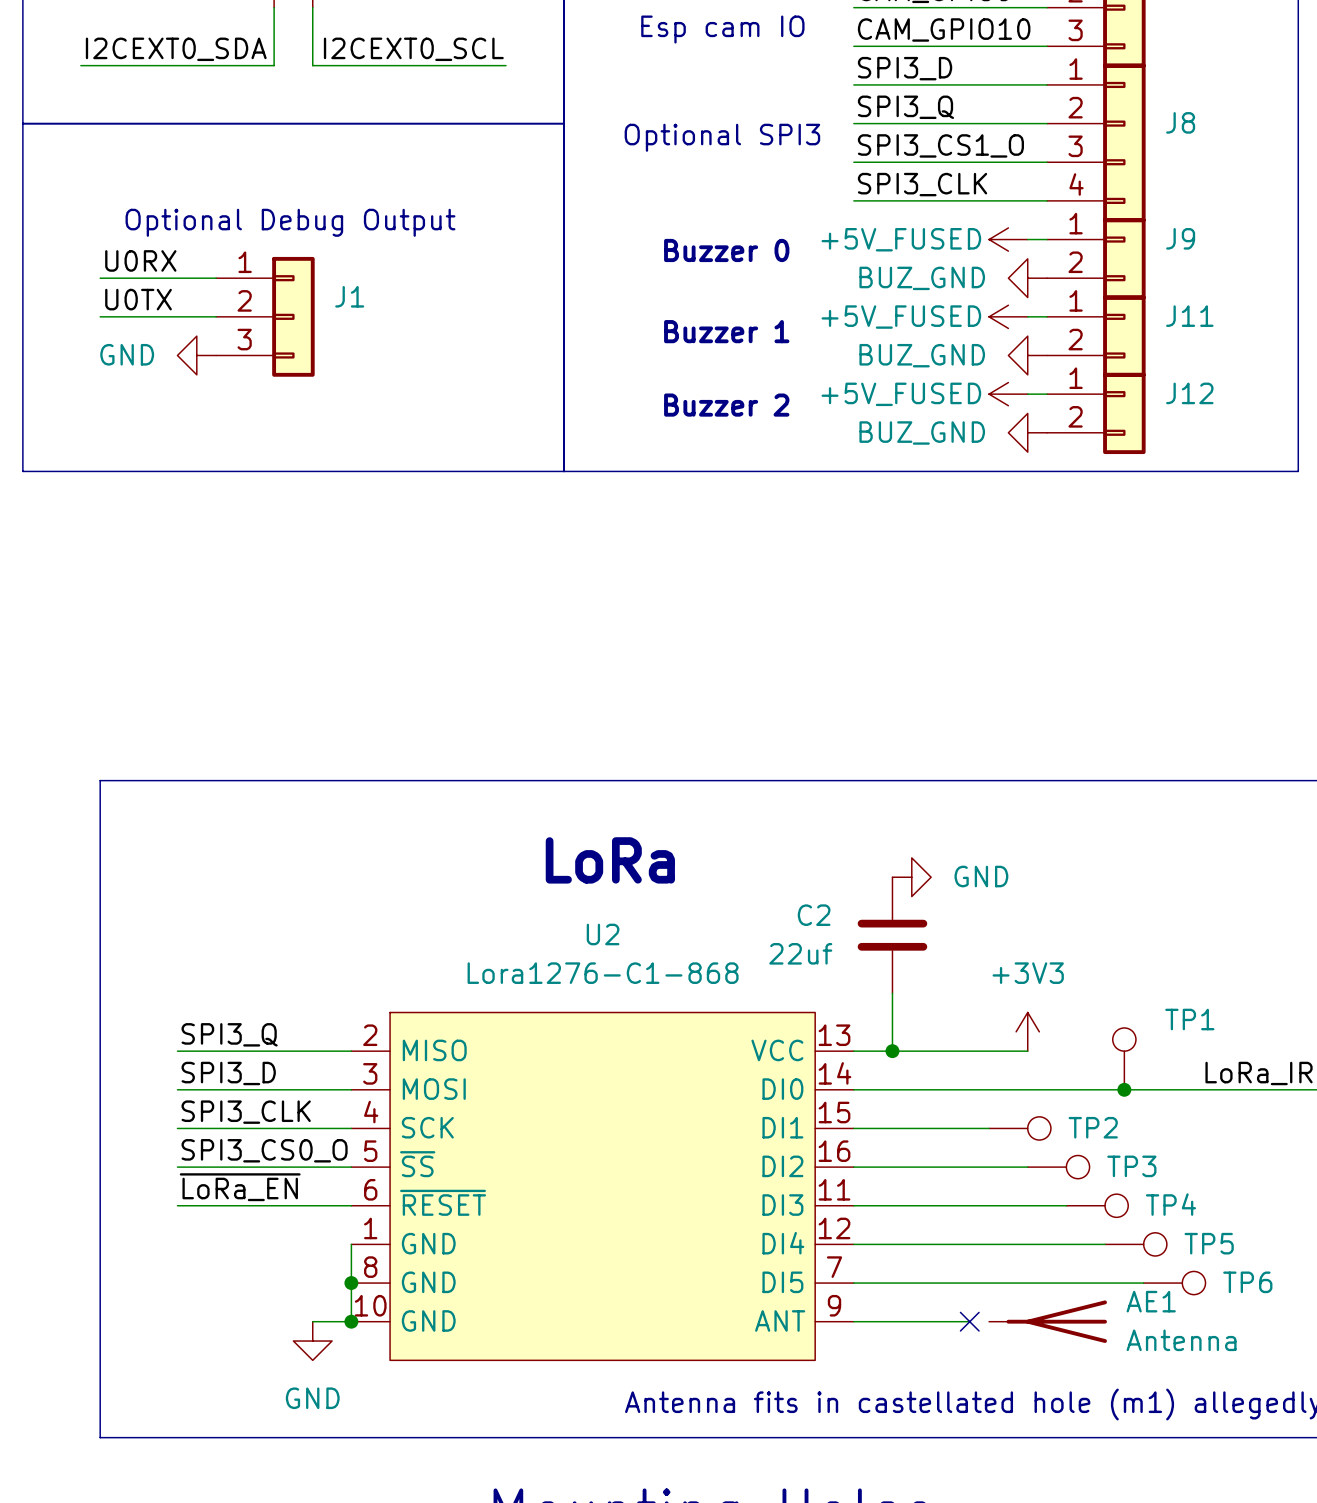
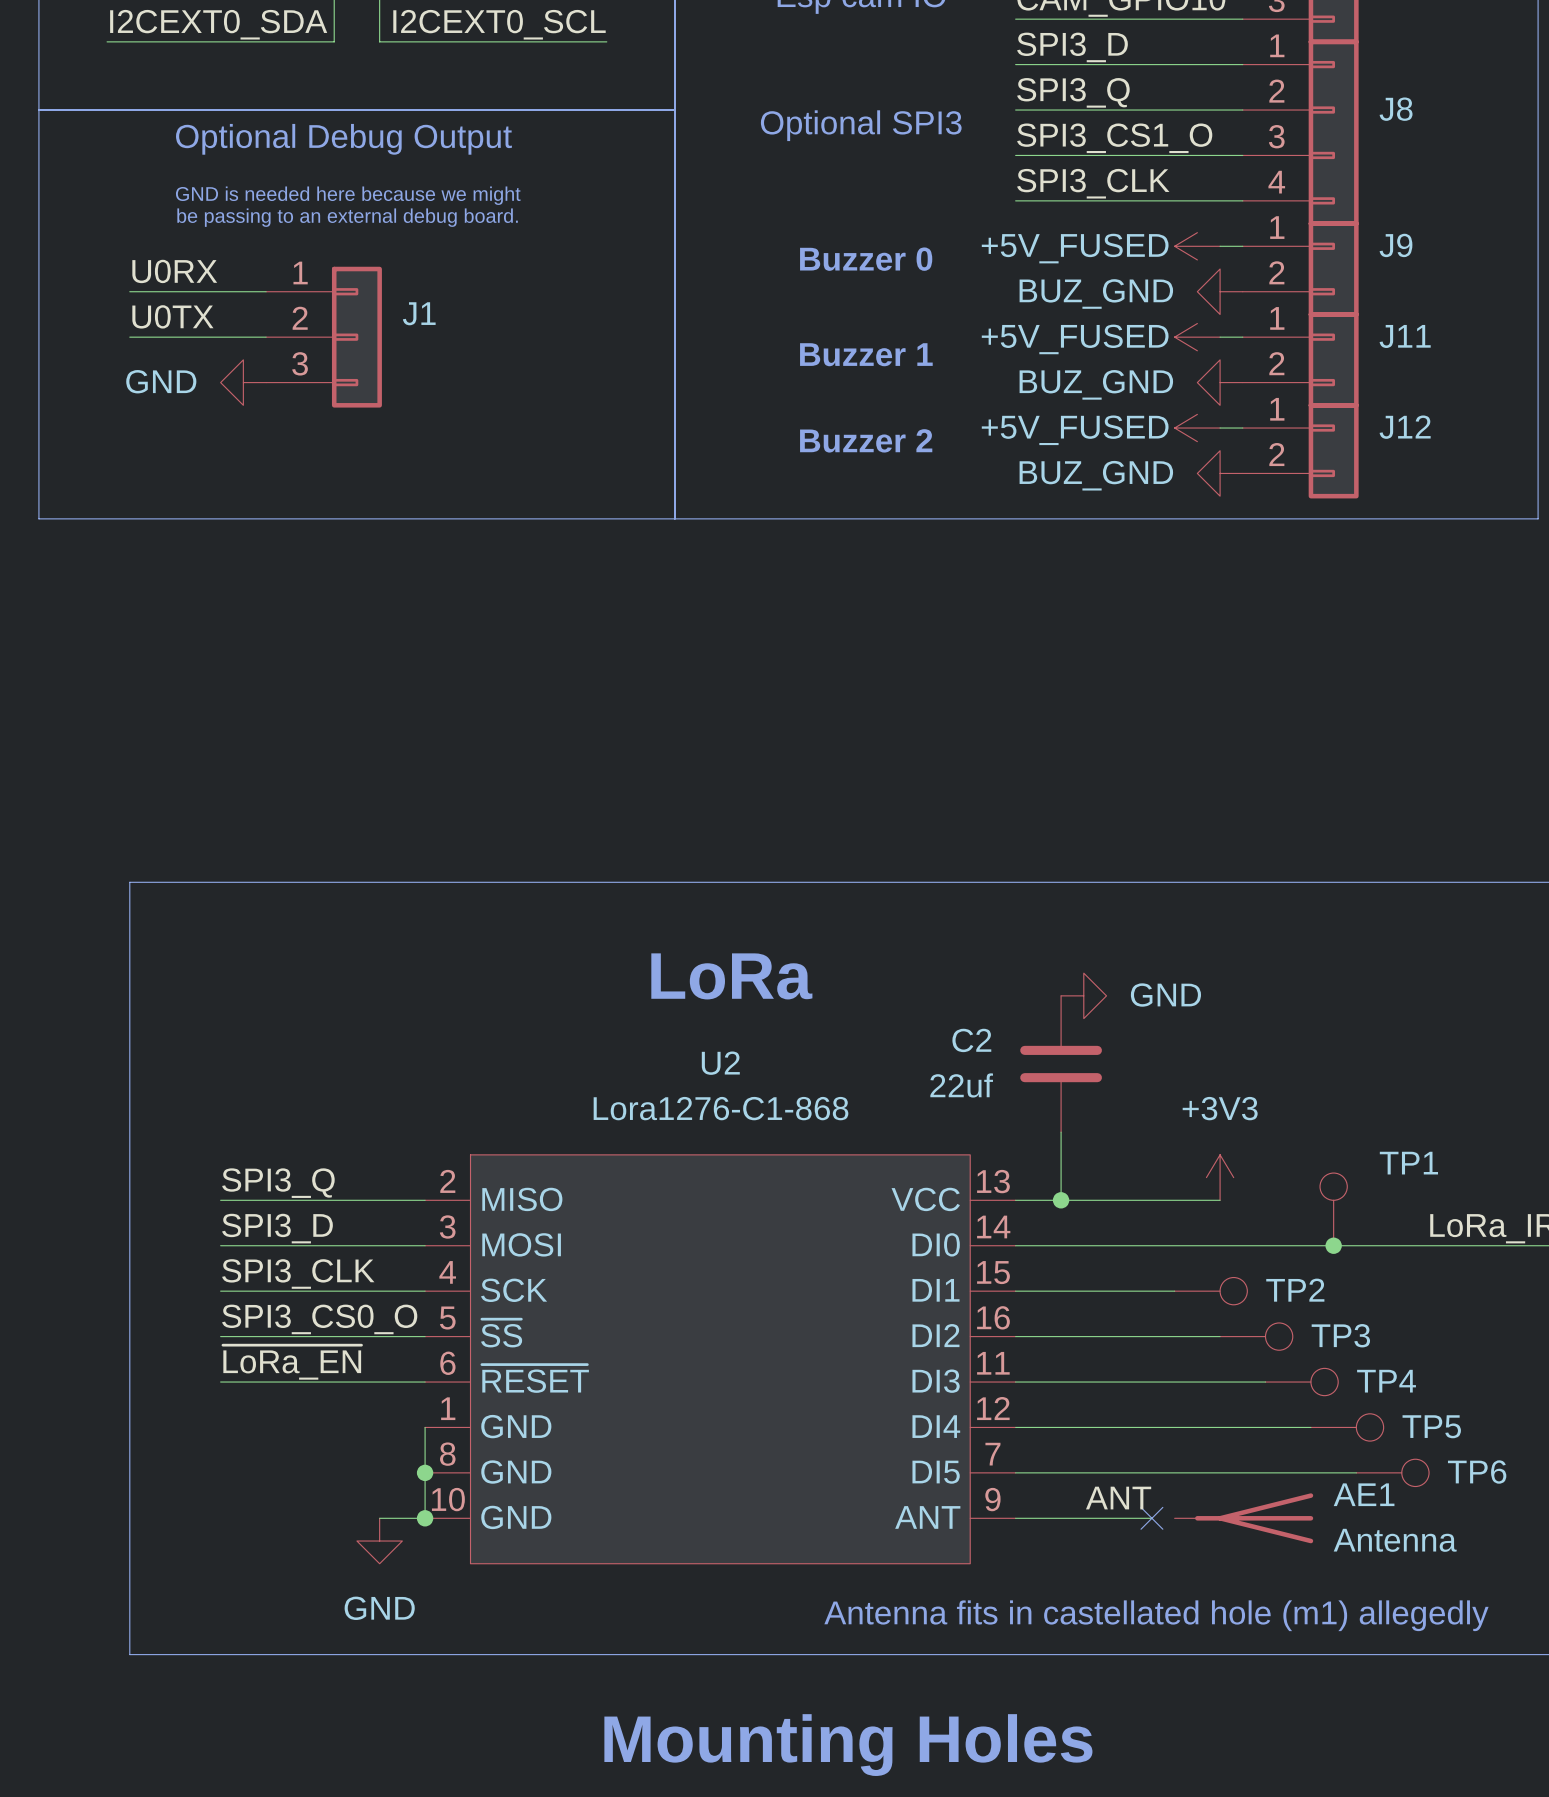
text: none -> Optional Debug Output (343, 139)
text: none -> GND is needed here because we might (348, 195)
text: Optional Debug Output (290, 222) -> be passing to an external debug board. (347, 217)
label: none -> ANT (1118, 1498)

